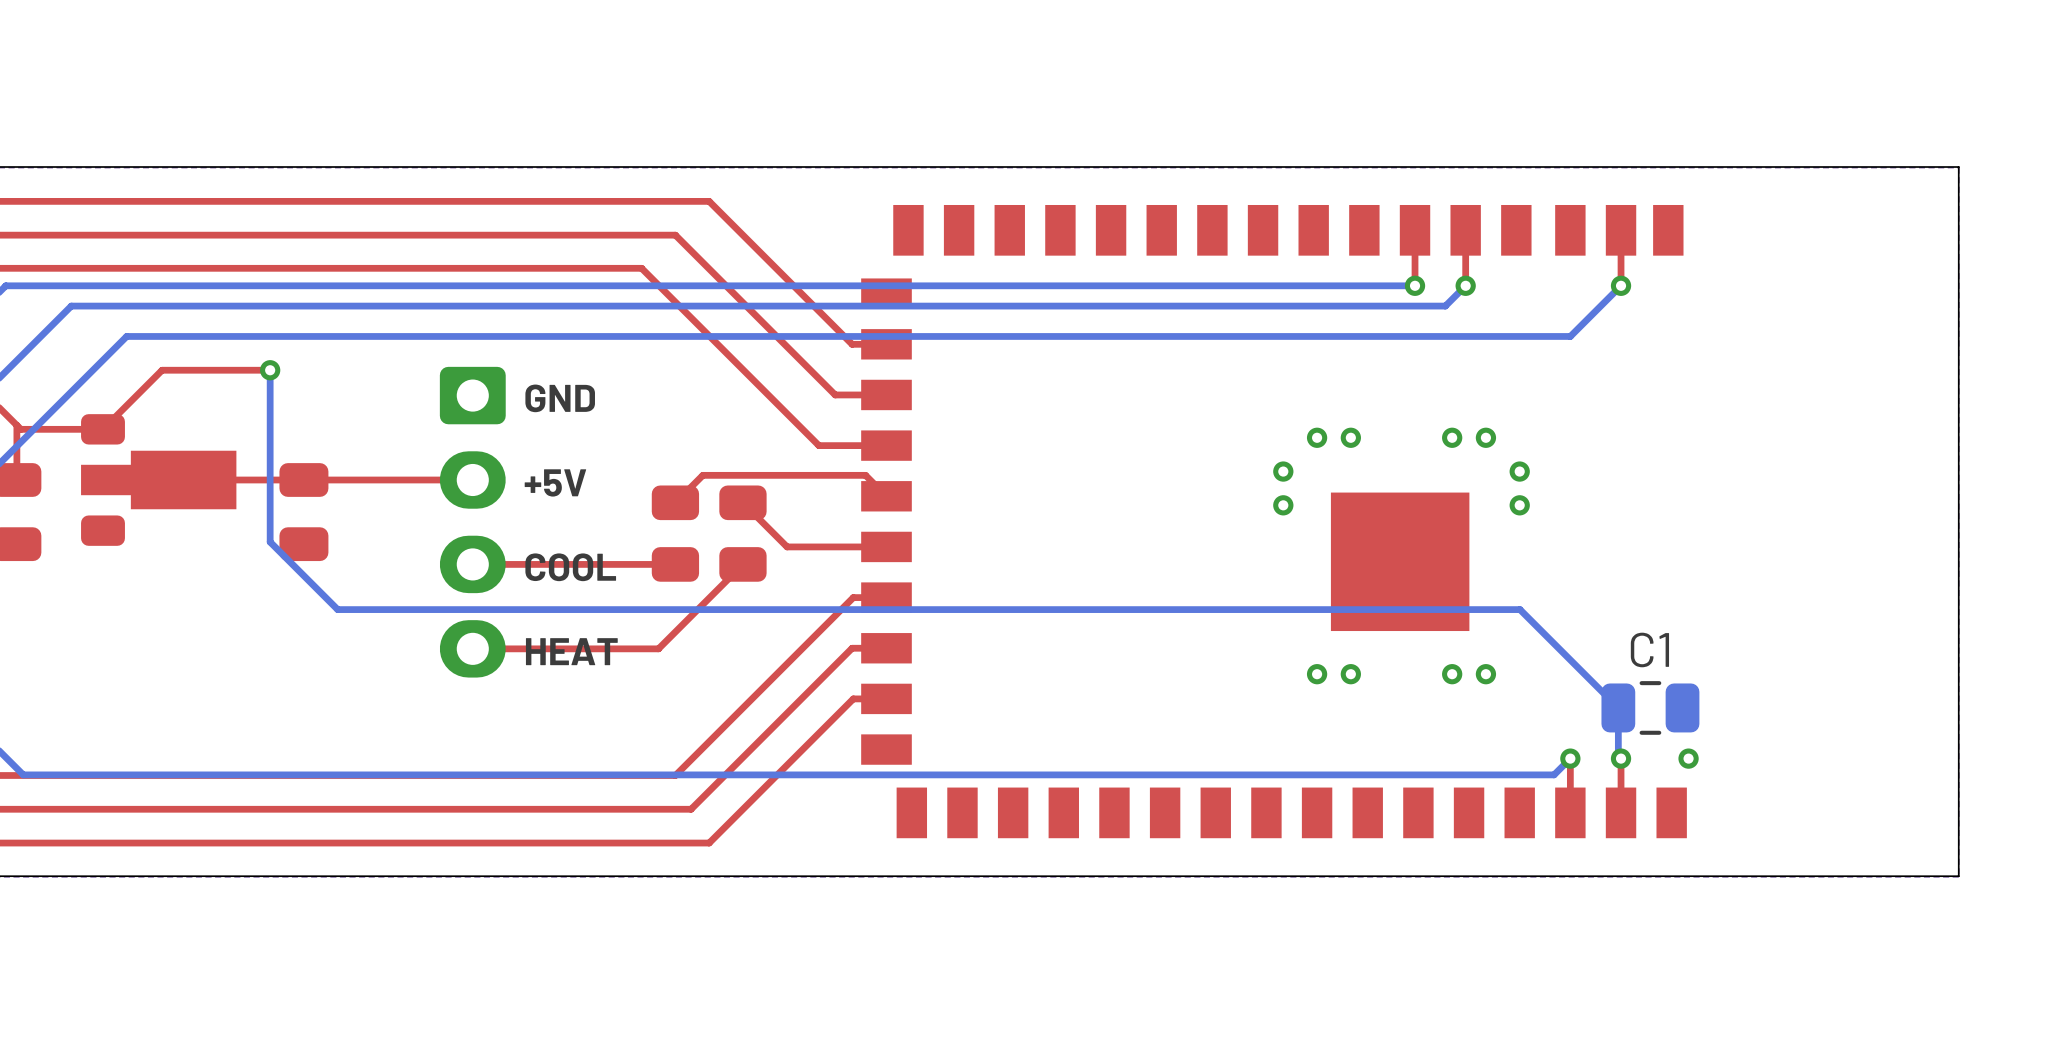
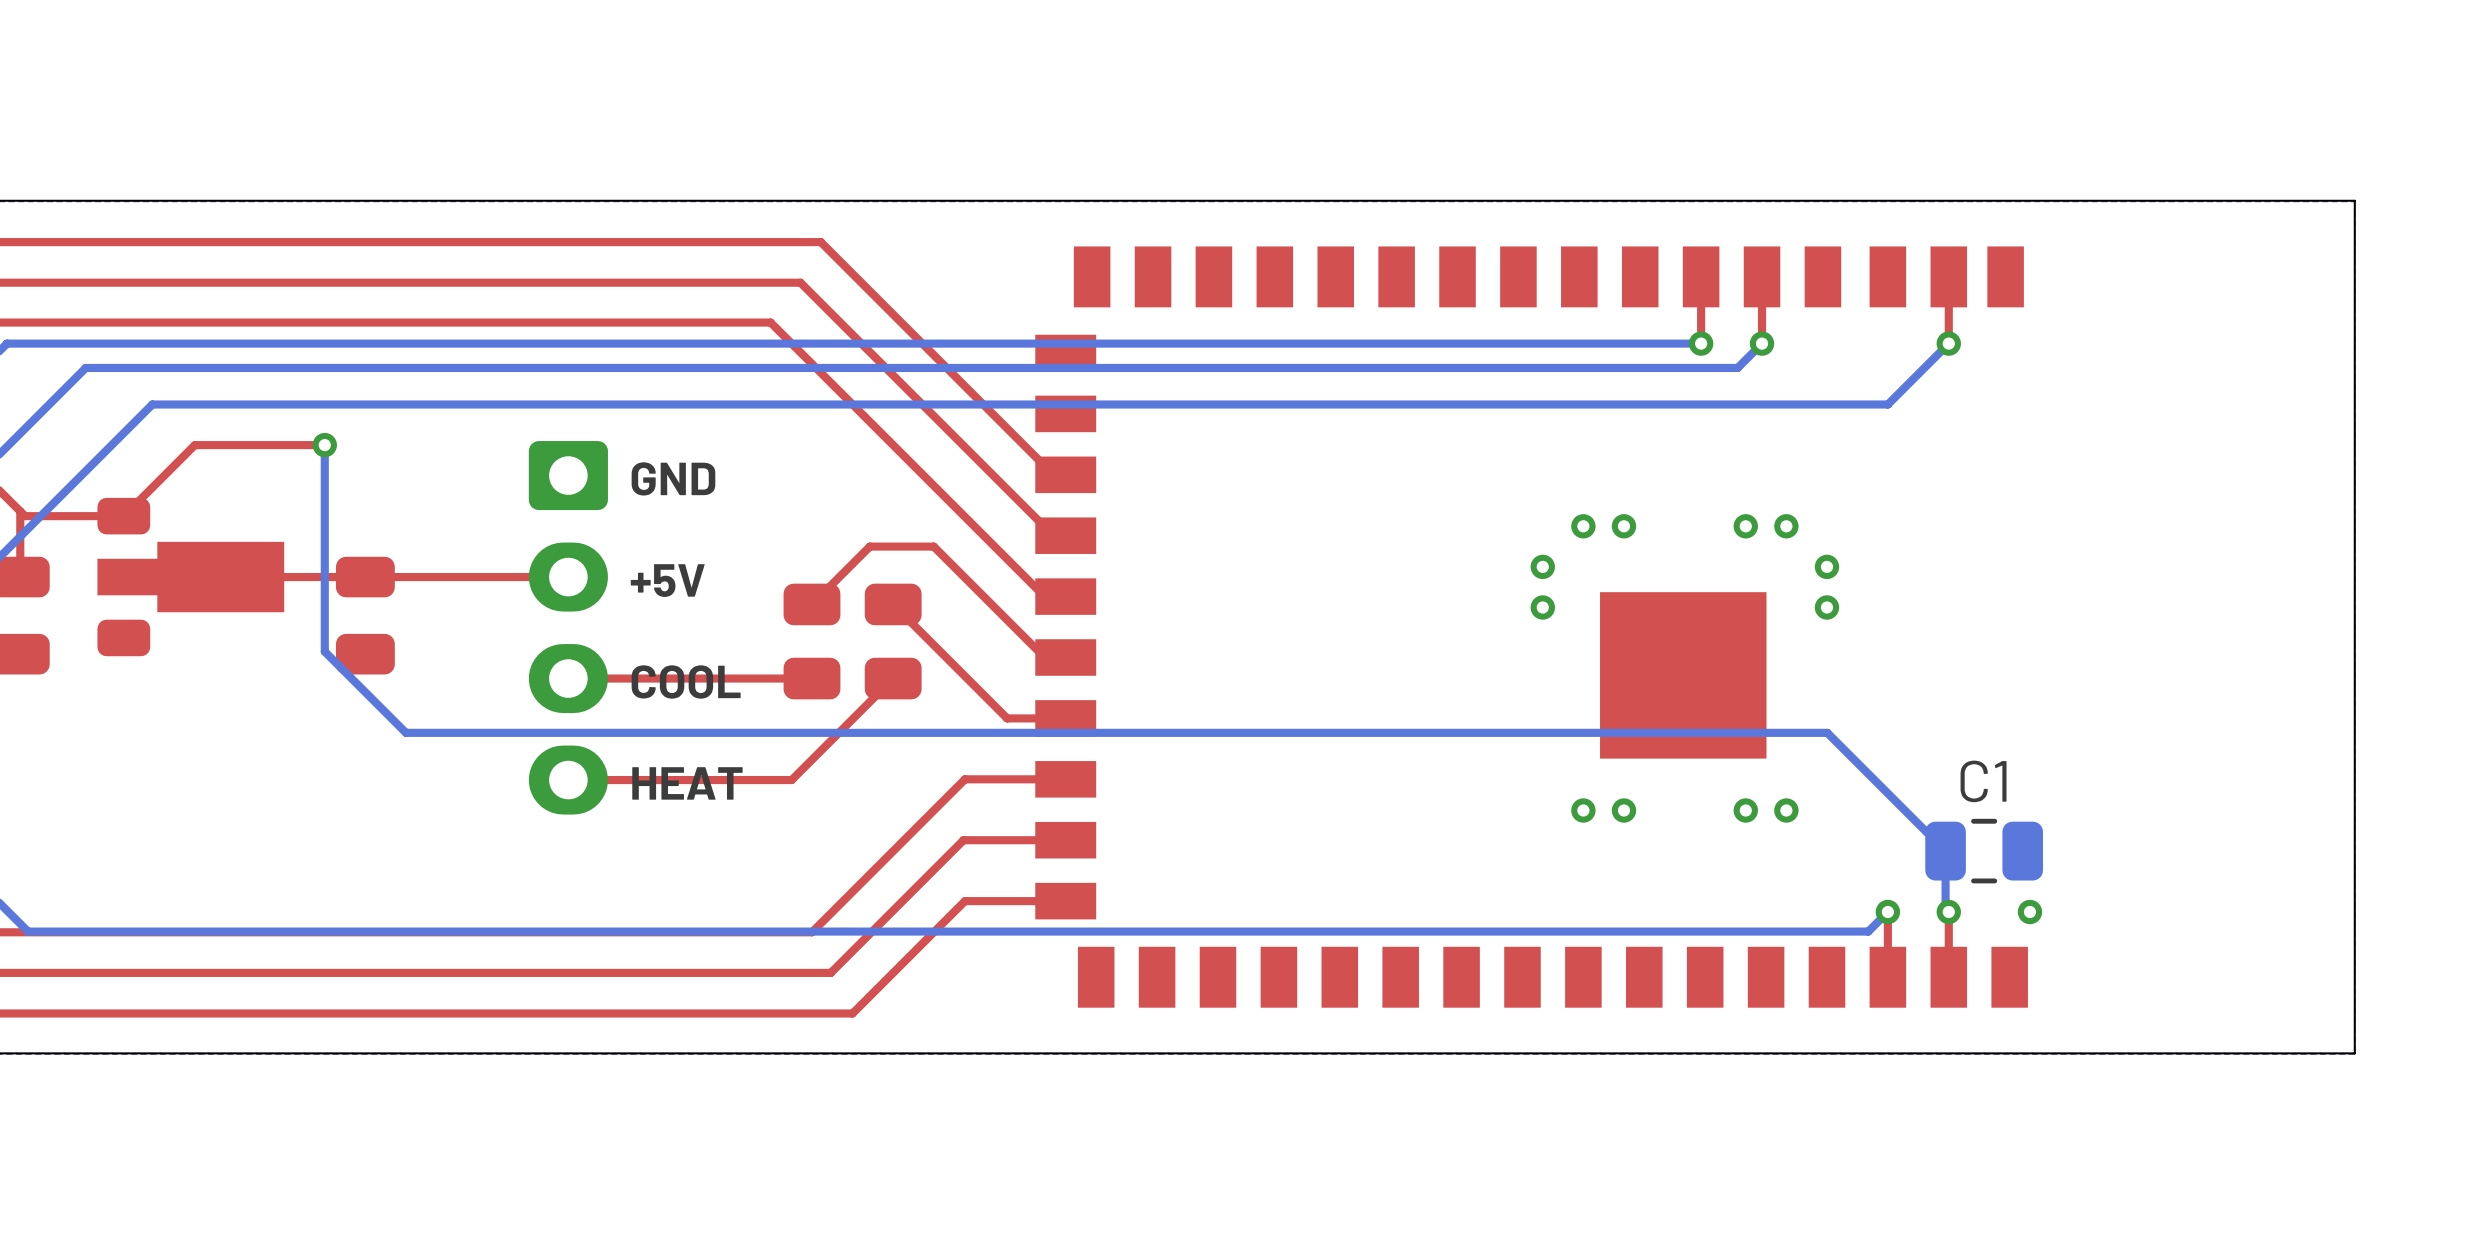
top track: (682, 201) (709, 201) (852, 344) (886, 344) -> none
top track: (665, 235) (675, 235) (835, 394) (876, 394) -> (820, 242) (1053, 474)
top track: none -> (800, 282) (1053, 535)
top track: (641, 268) (818, 445) (869, 445) -> (770, 322) (1044, 596) (1065, 596)
top track: (702, 475) (865, 475) (886, 496) -> (844, 571) (869, 546) (933, 546) (1044, 657)
top track: (869, 546) (787, 546) -> (1025, 718) (1007, 718) (946, 657)
top track: (853, 597) (802, 648) -> (1024, 779) (964, 779)
top track: (852, 648) (801, 698) -> (1025, 840) (963, 840)
top track: (853, 698) (802, 749) -> (1065, 901) (964, 901)

